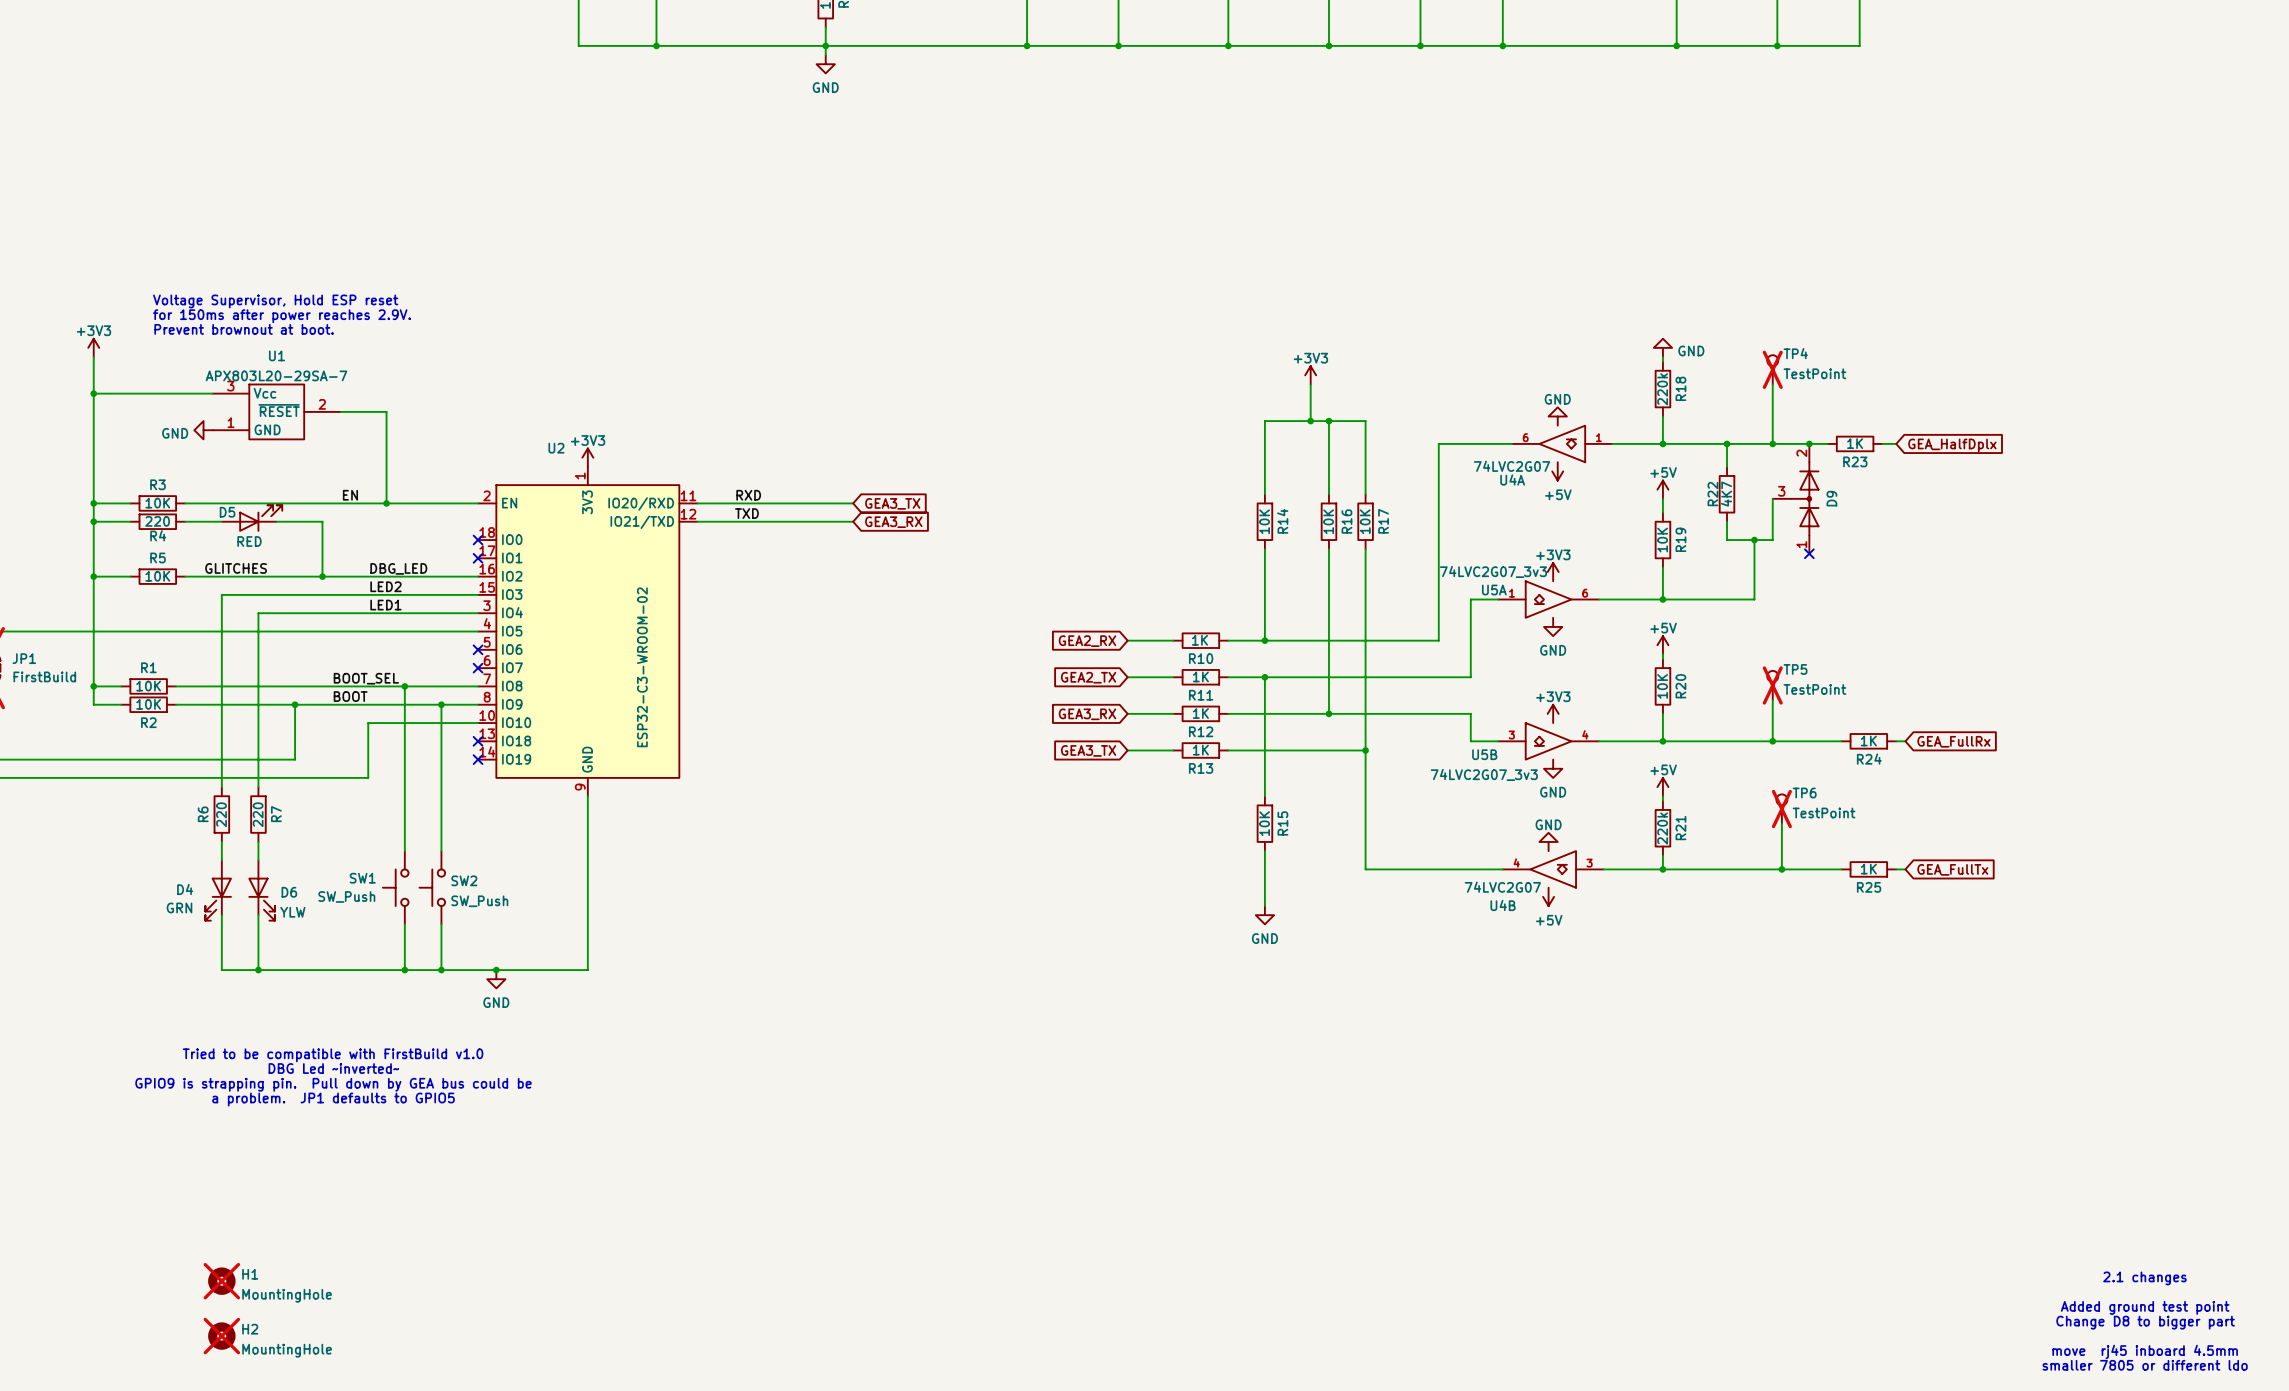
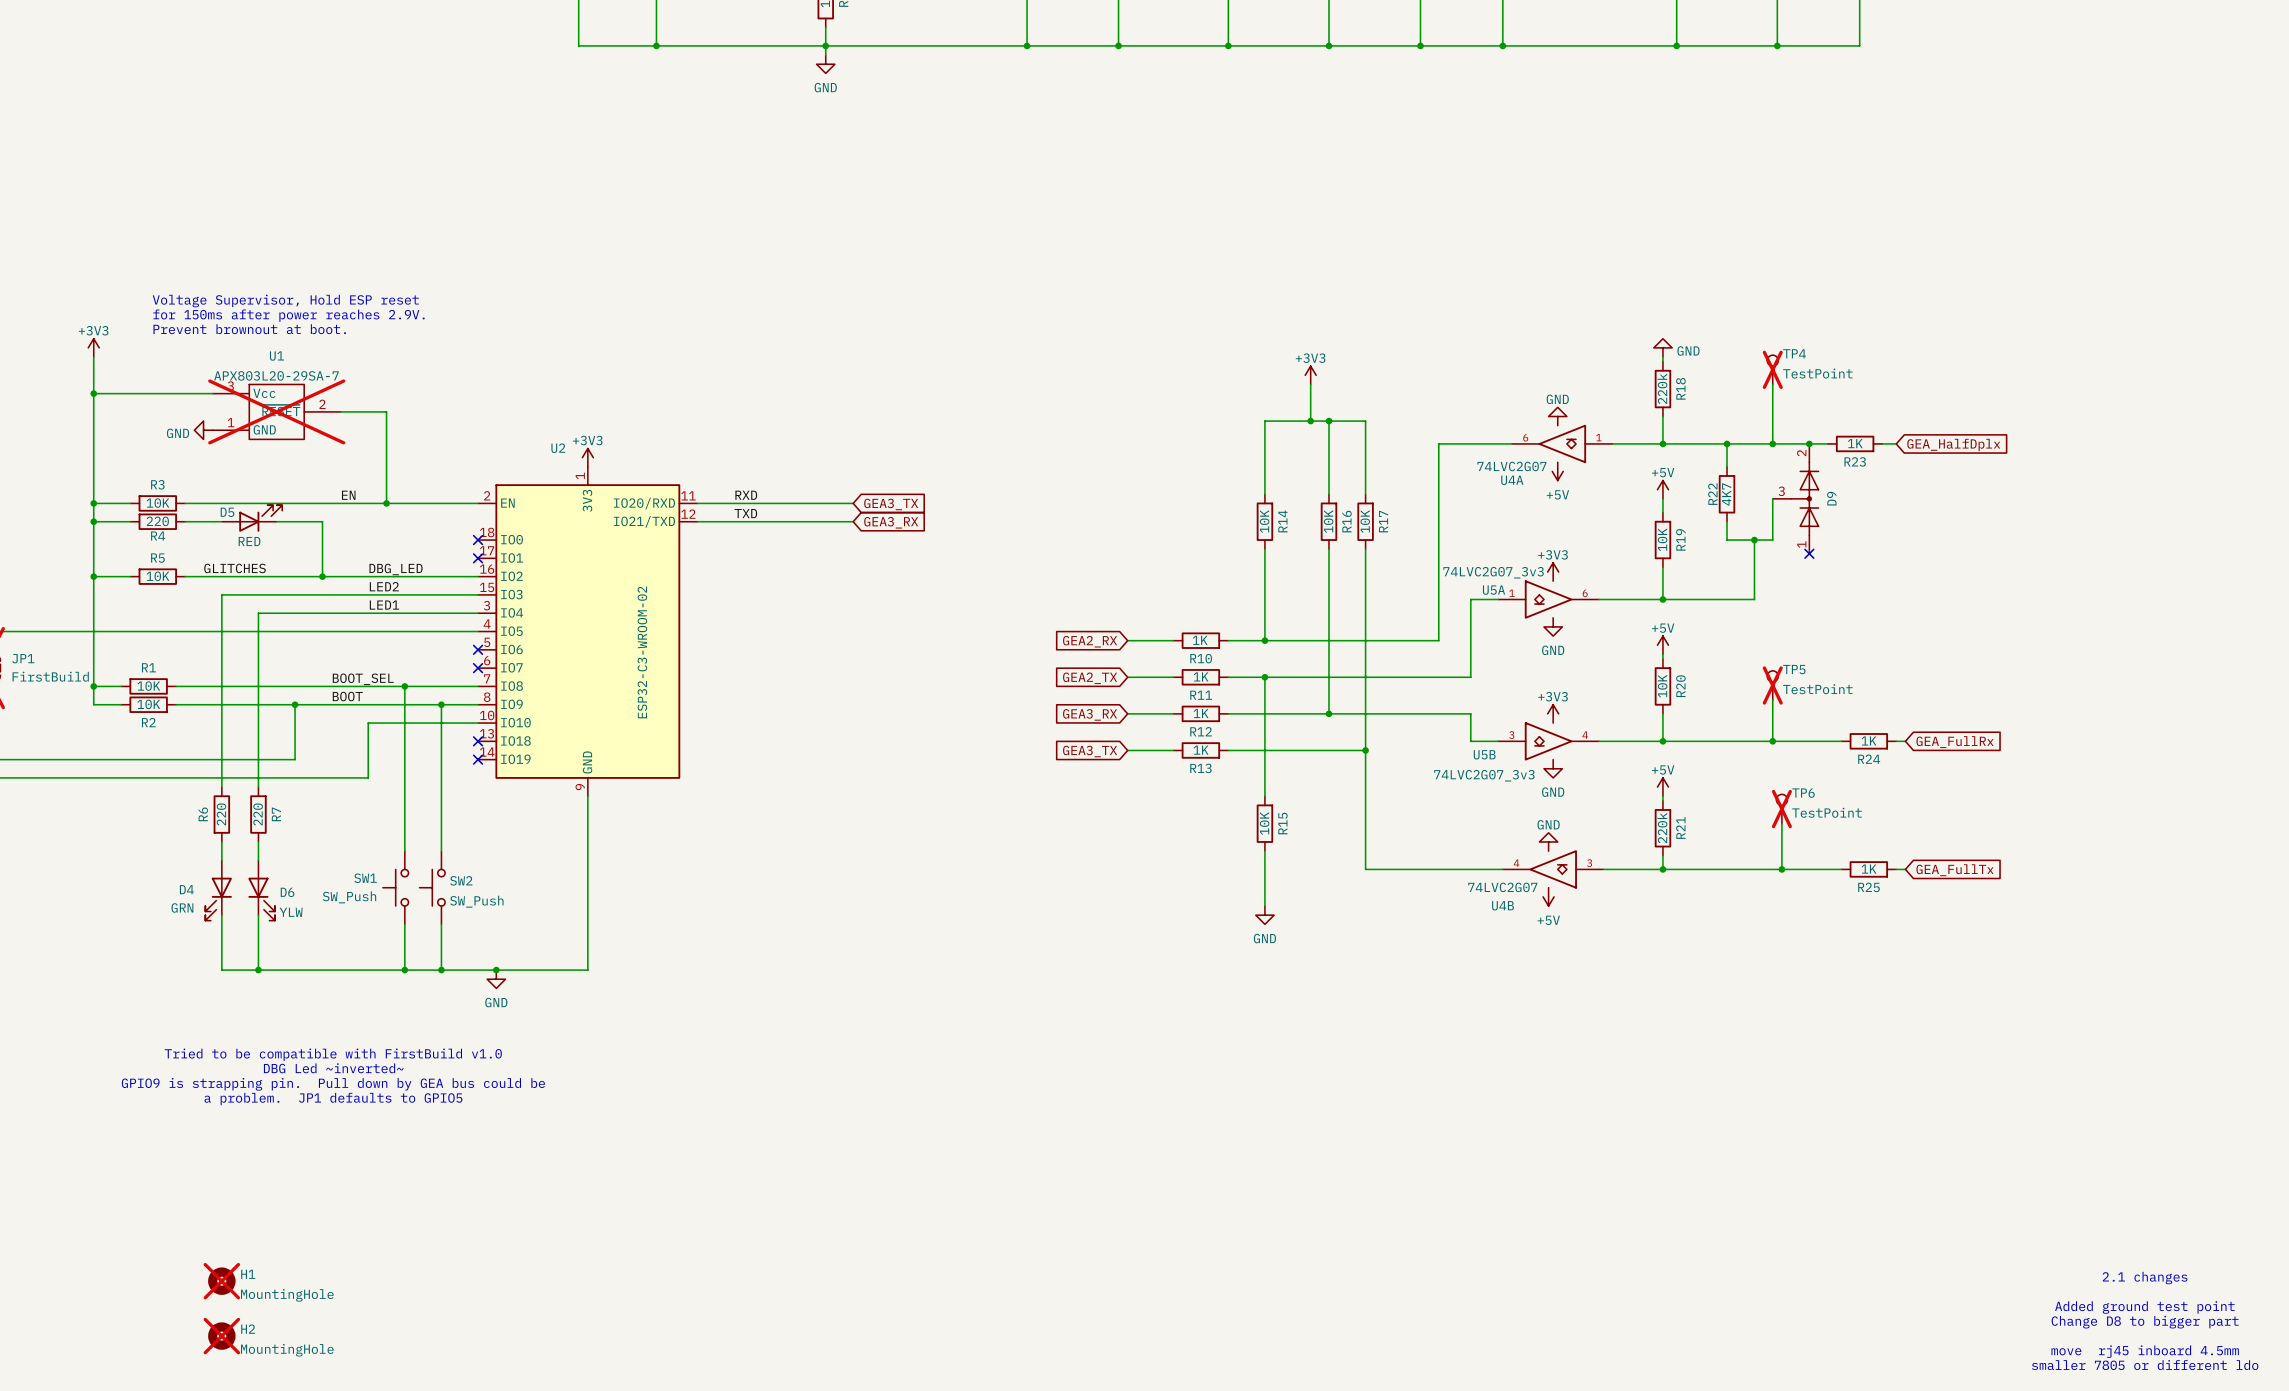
U1 do-not-place cross: none -> (276, 411)

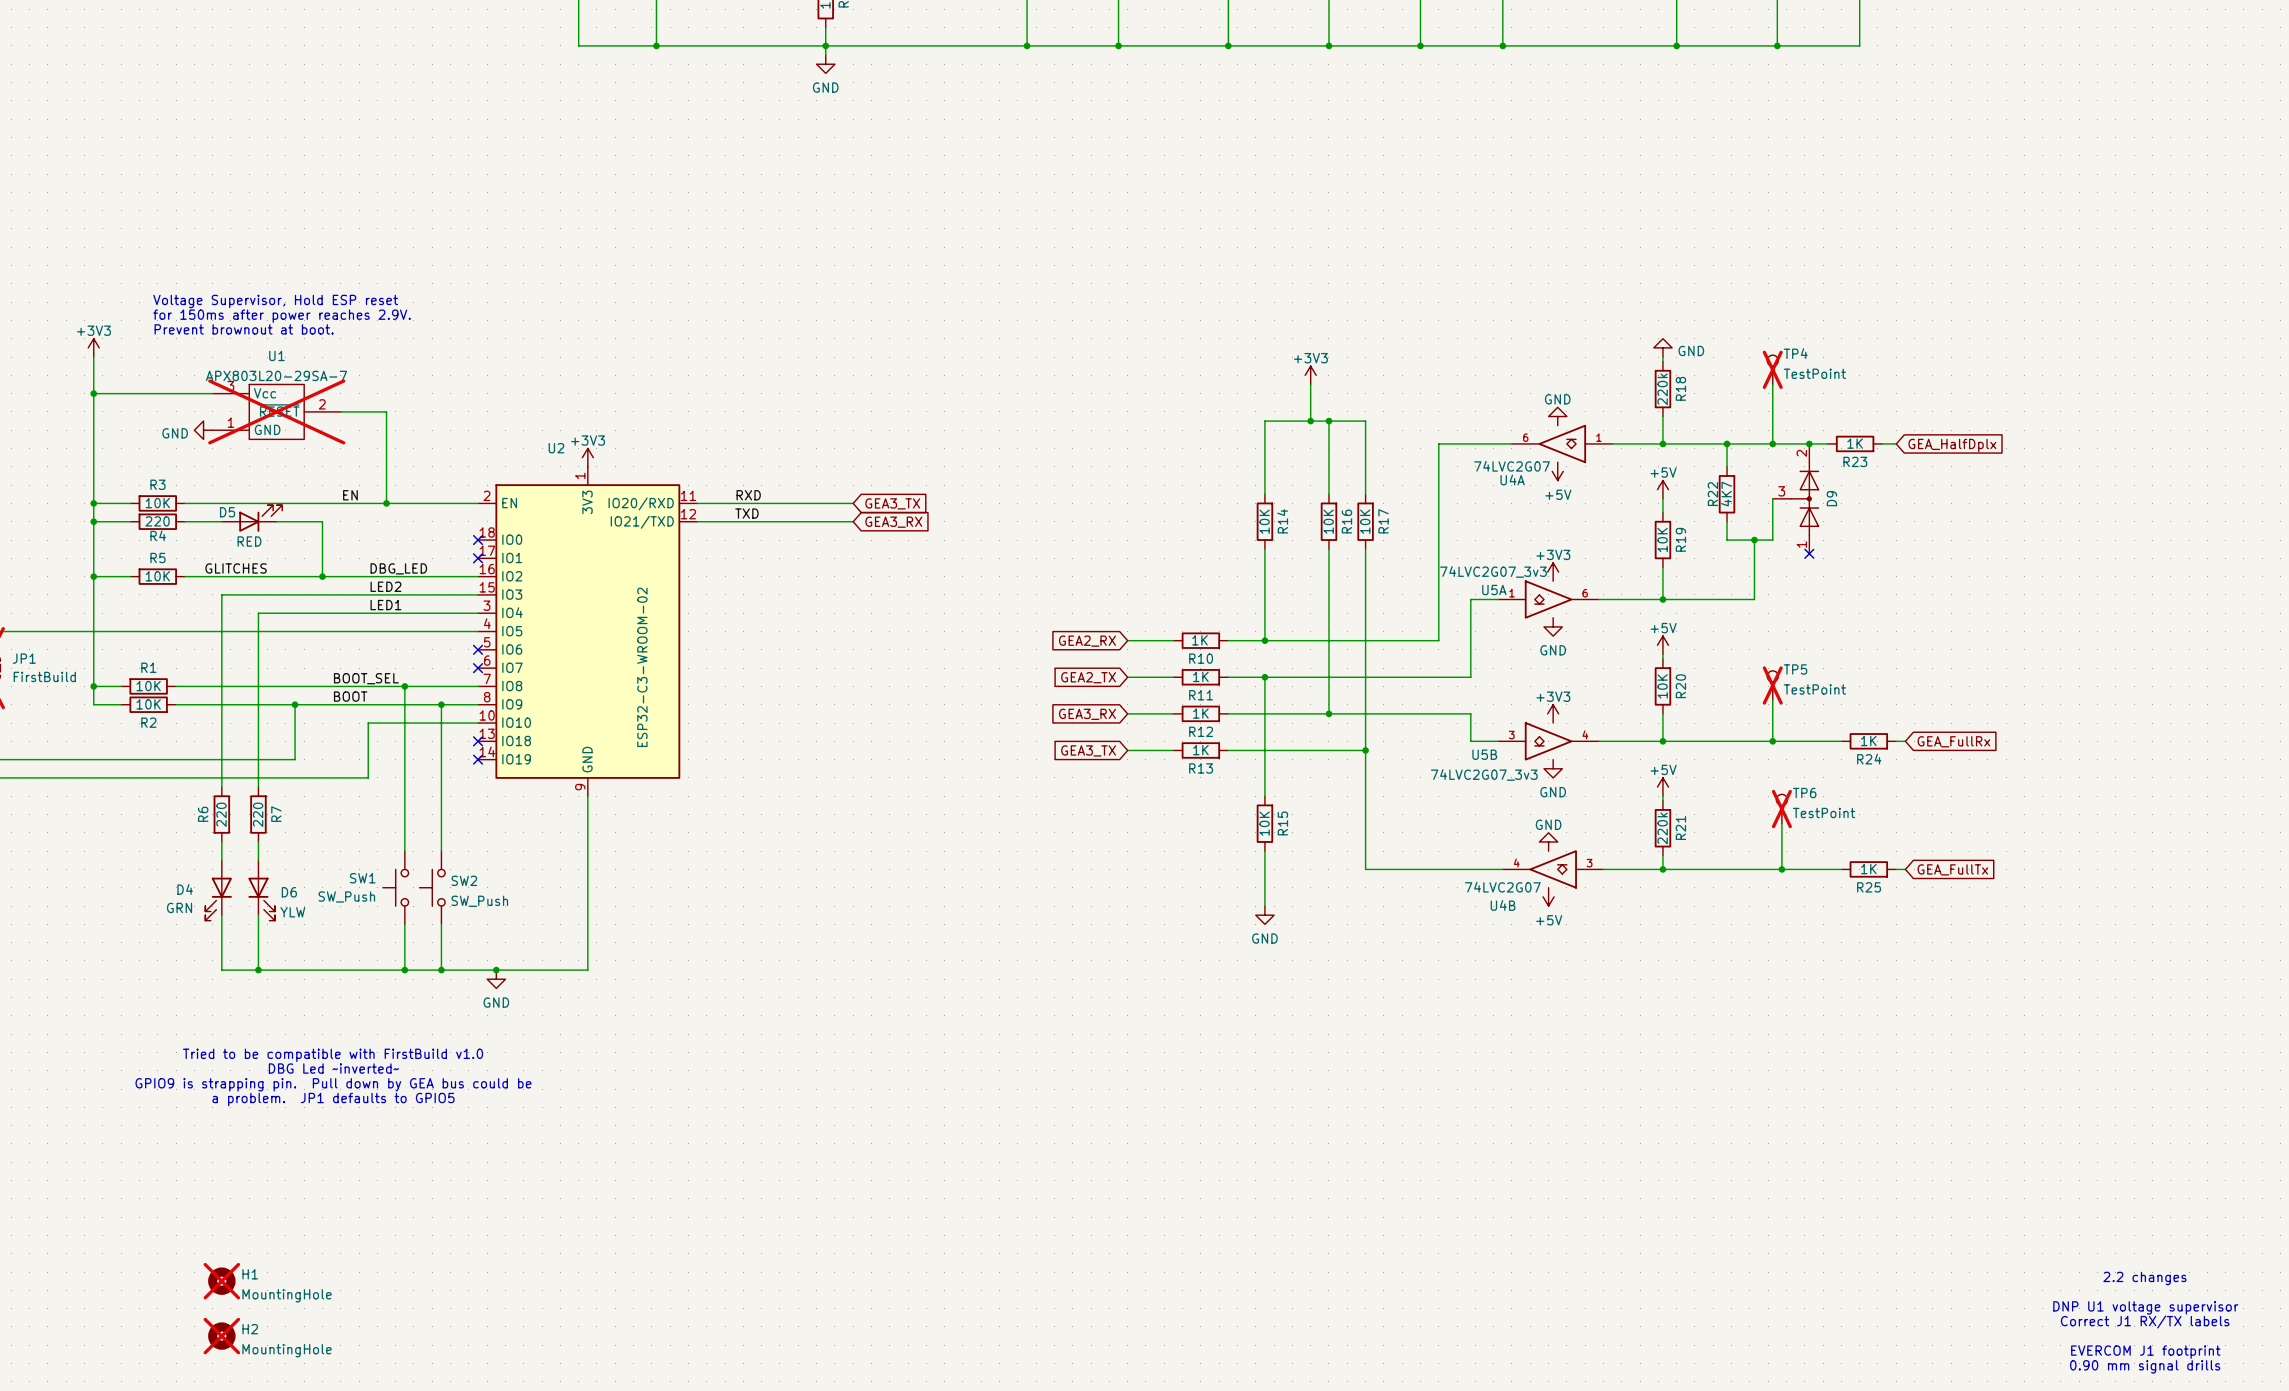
text: 2.1 changes (2145, 1278) -> 2.2 changes (2144, 1278)
text: Added ground test point (2144, 1307) -> DNP U1 voltage supervisor (2145, 1307)
text: Change D8 to bigger part (2145, 1322) -> Correct J1 RX/TX labels (2145, 1321)
text: move rj45 inboard 4.5mm (2145, 1351) -> EVERCOM J1 footprint (2145, 1352)
text: smaller 7805 or different ldo (2145, 1365) -> 0.90 mm signal drills (2145, 1366)

